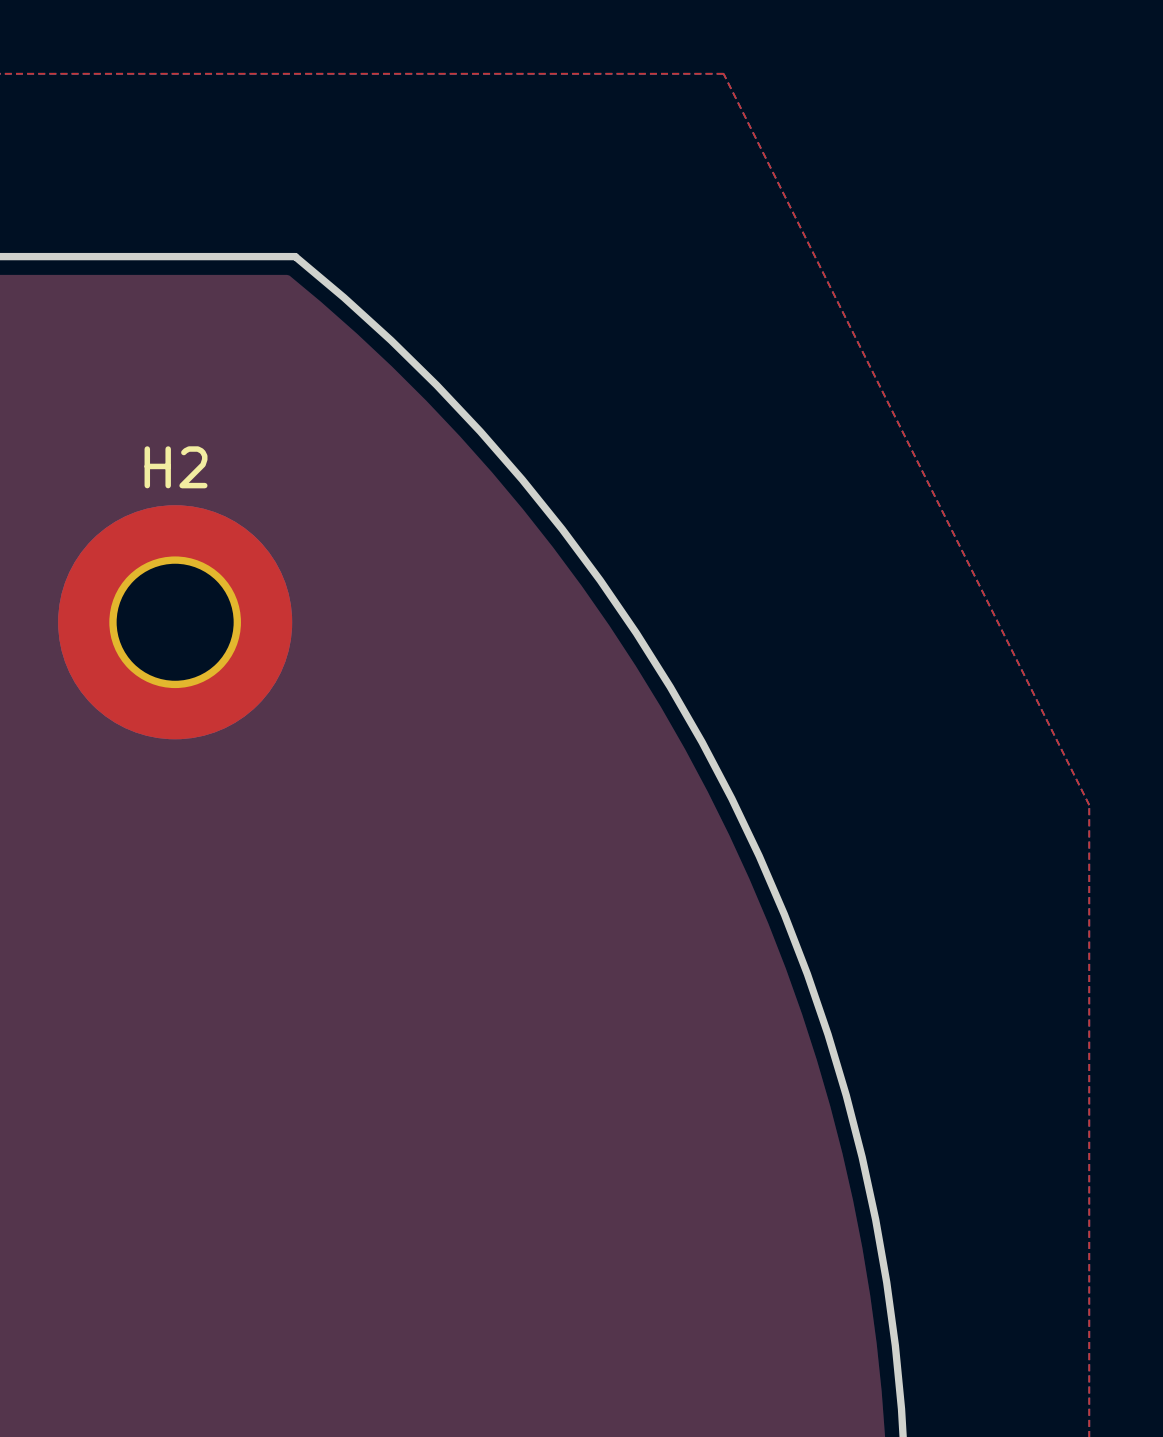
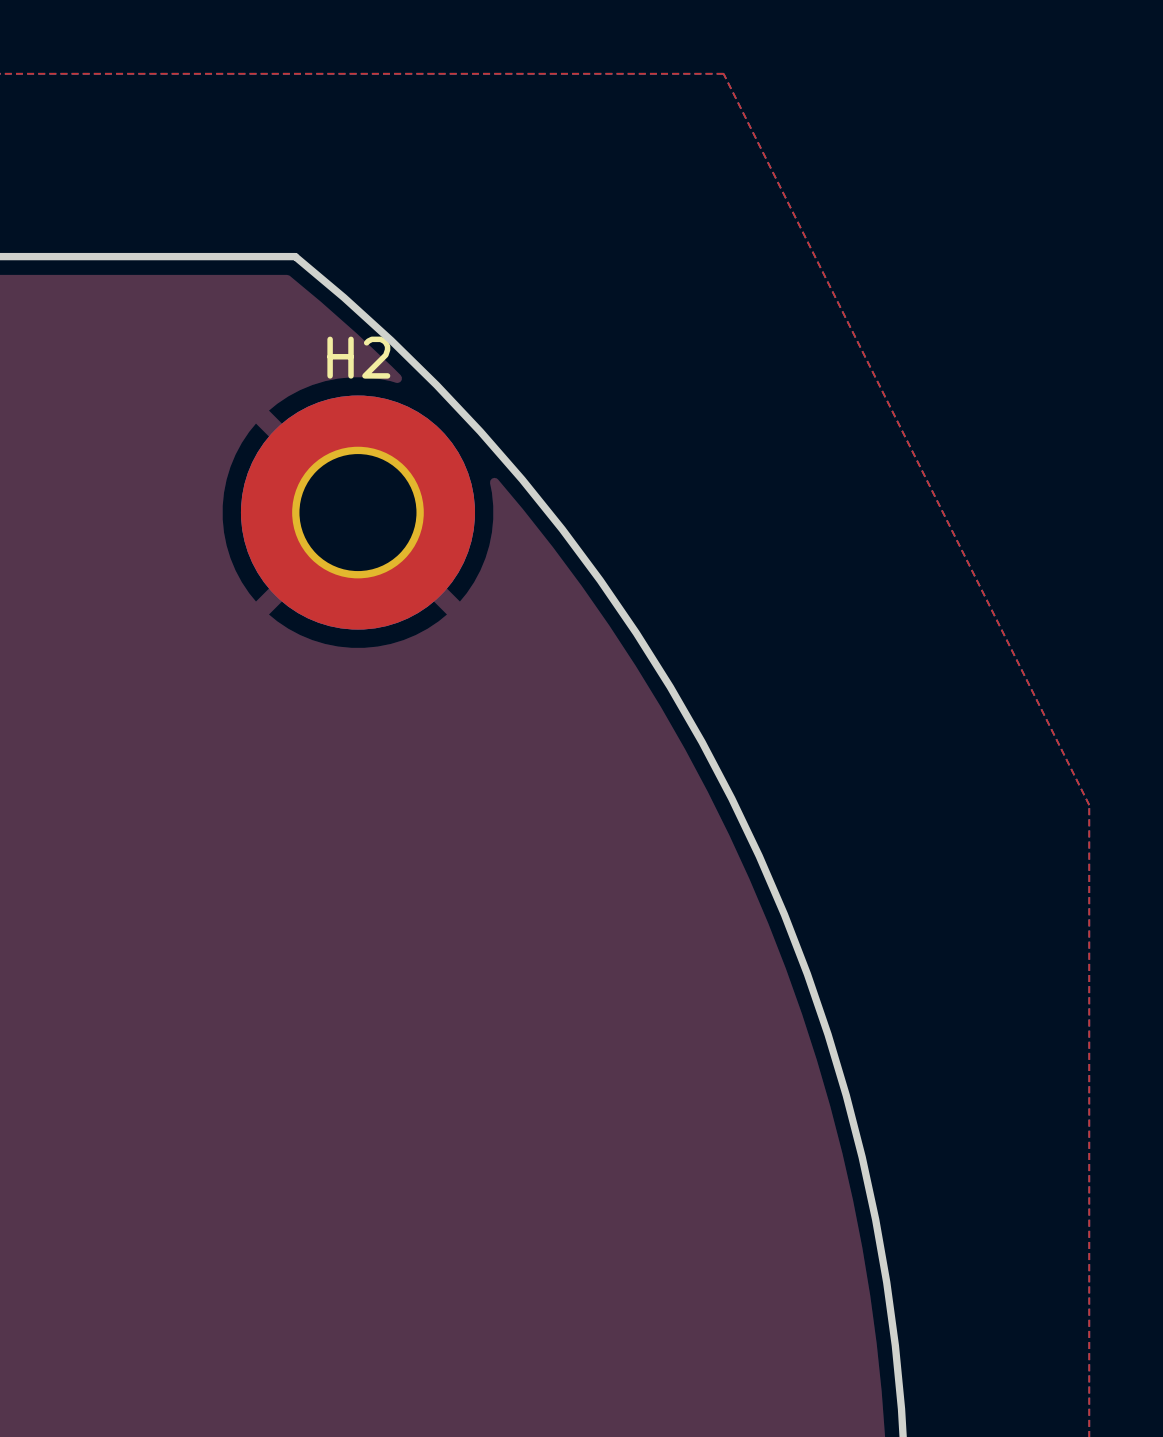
H2 position: (175, 622) -> (357, 512)

